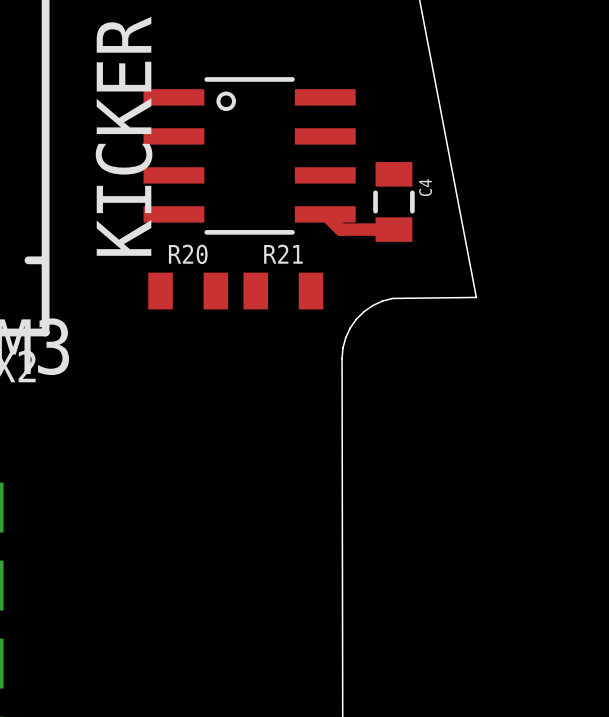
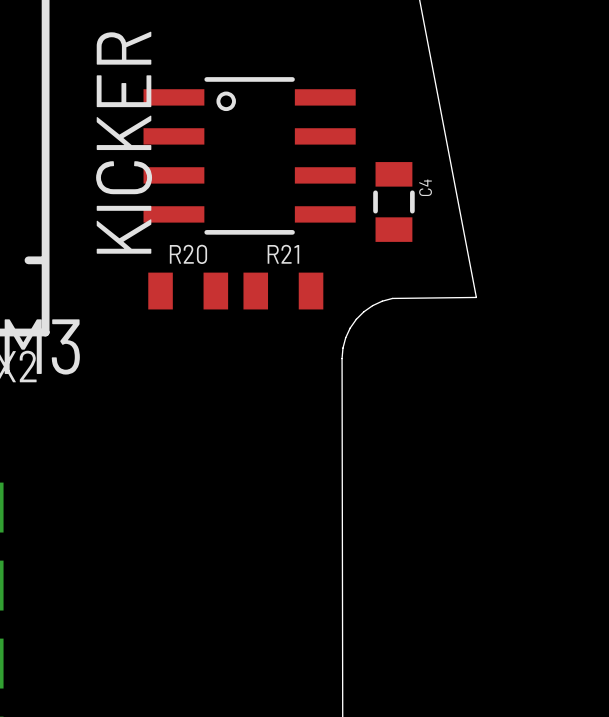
track: (325, 214) (340, 229) (393, 229) -> none

